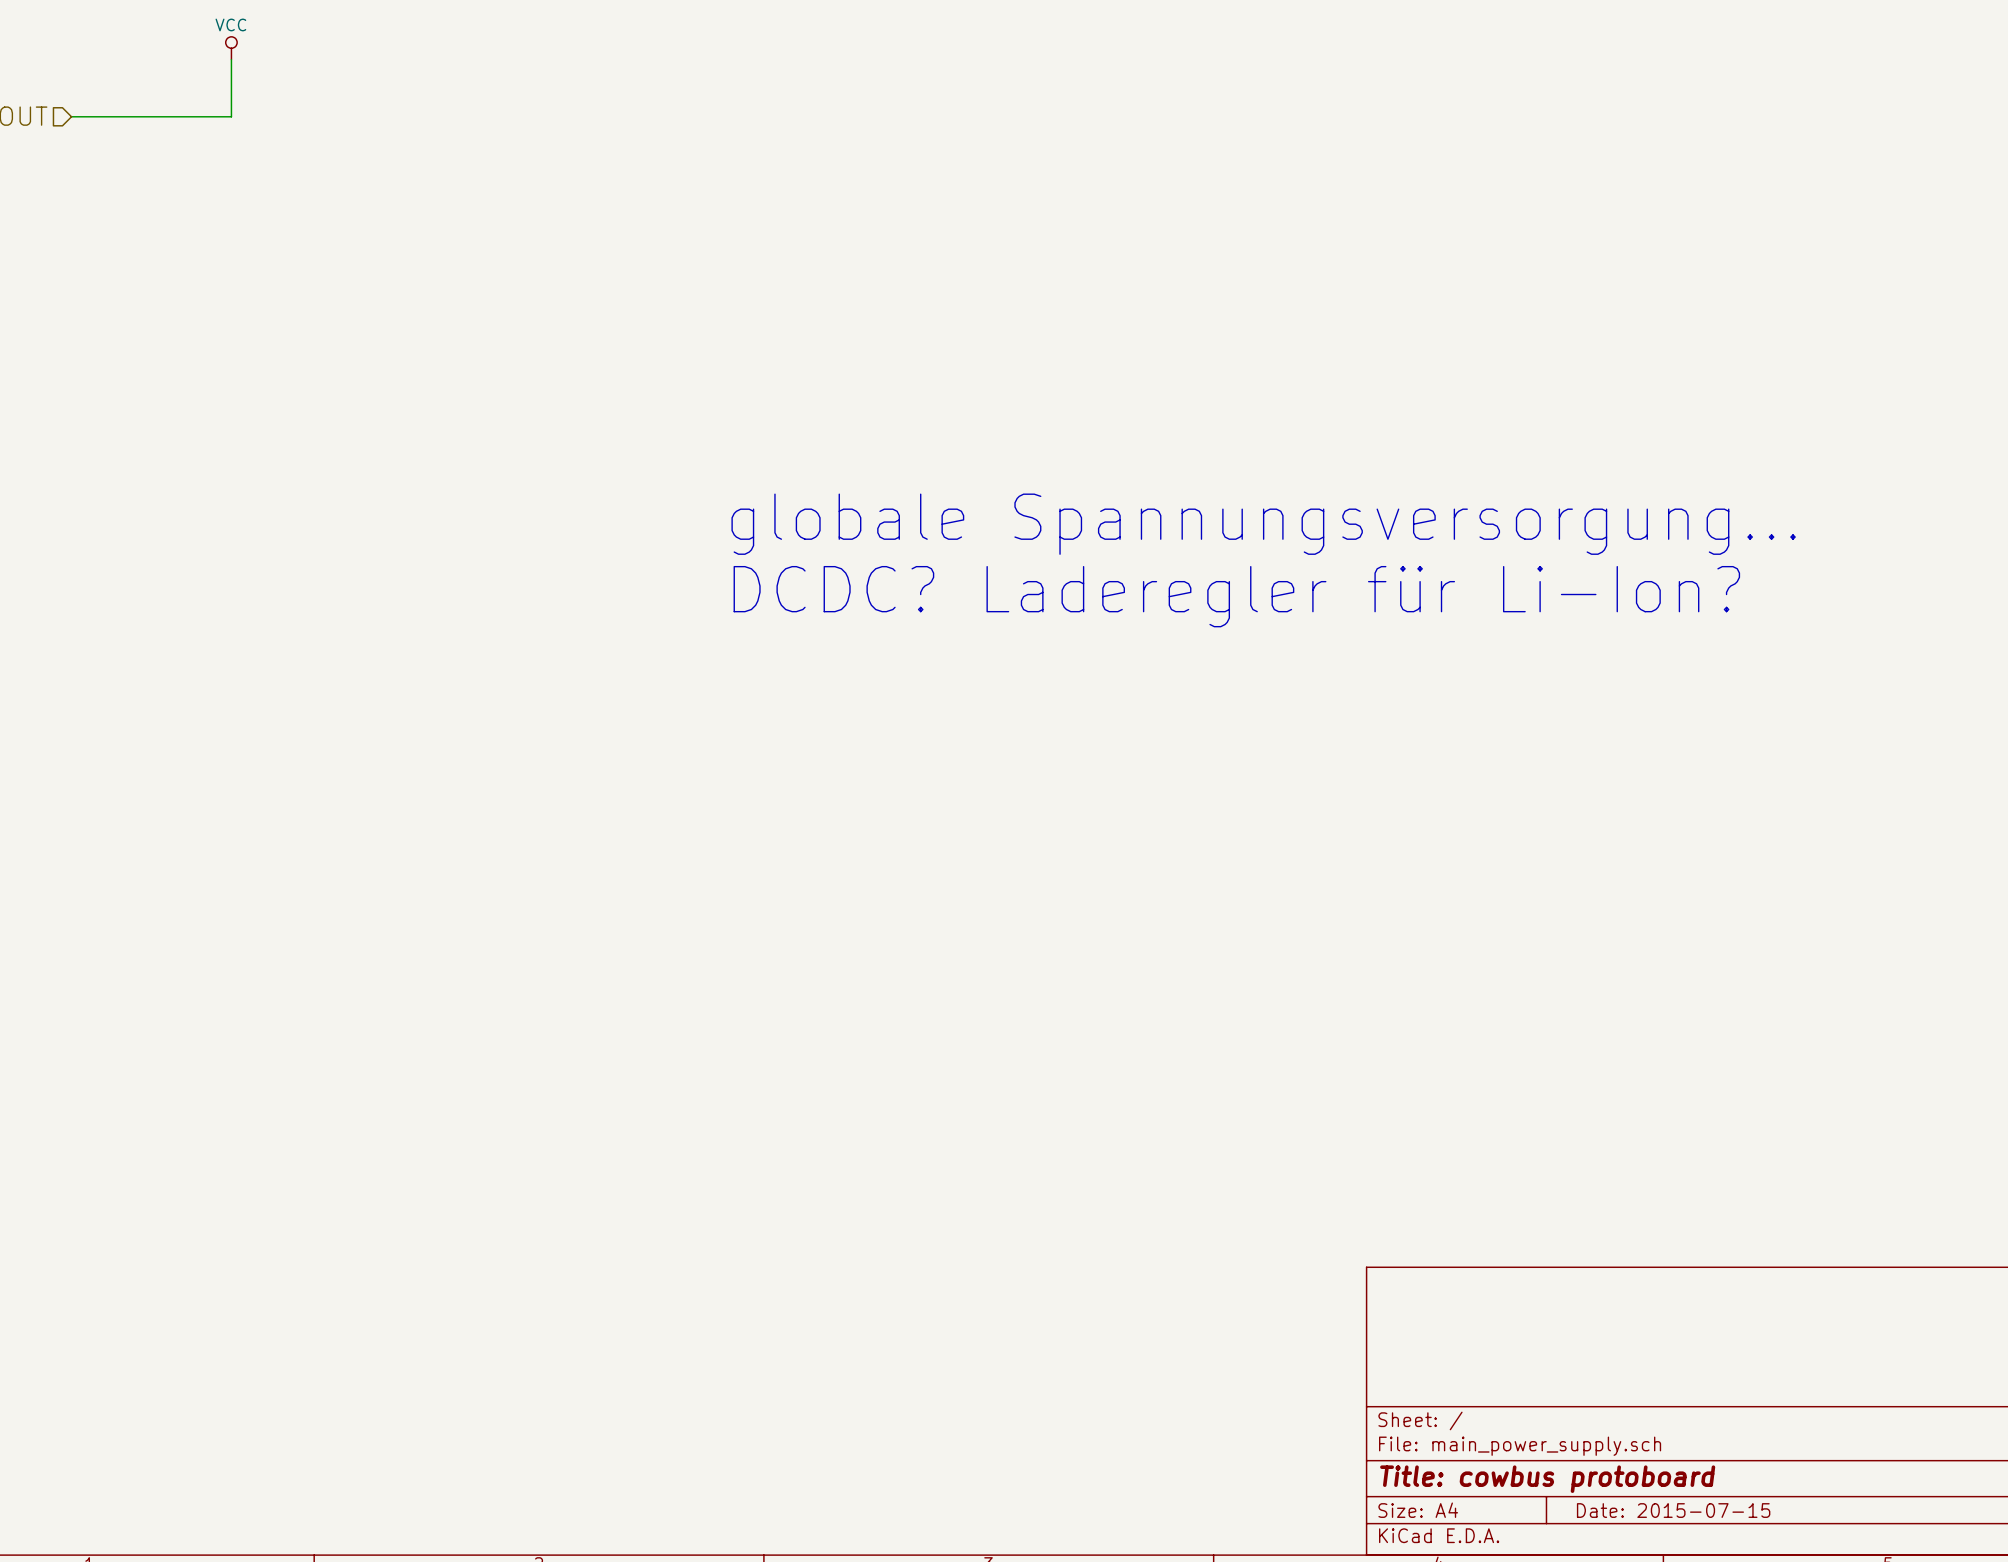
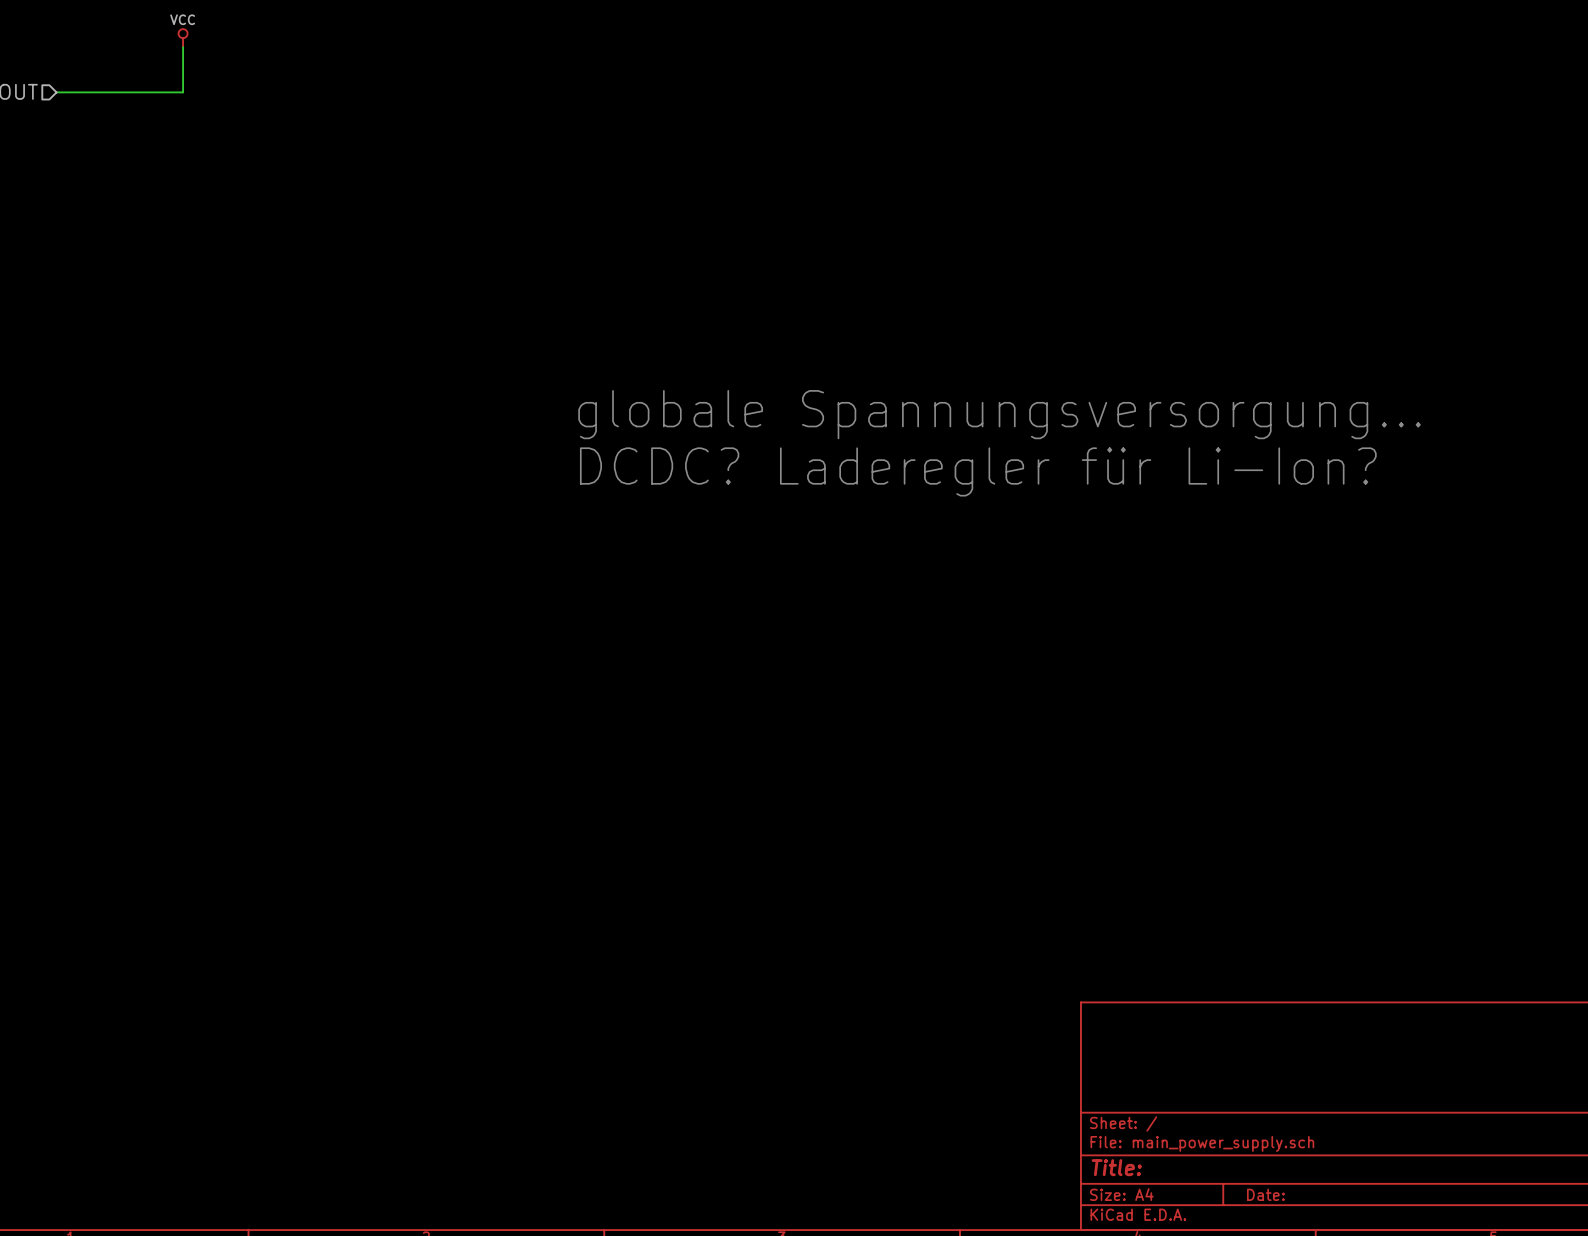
title block: Title: cowbus protoboard (1547, 1479) -> Title: (1116, 1167)
title block: Date: 2015-07-15 (1673, 1510) -> Date: (1265, 1194)

